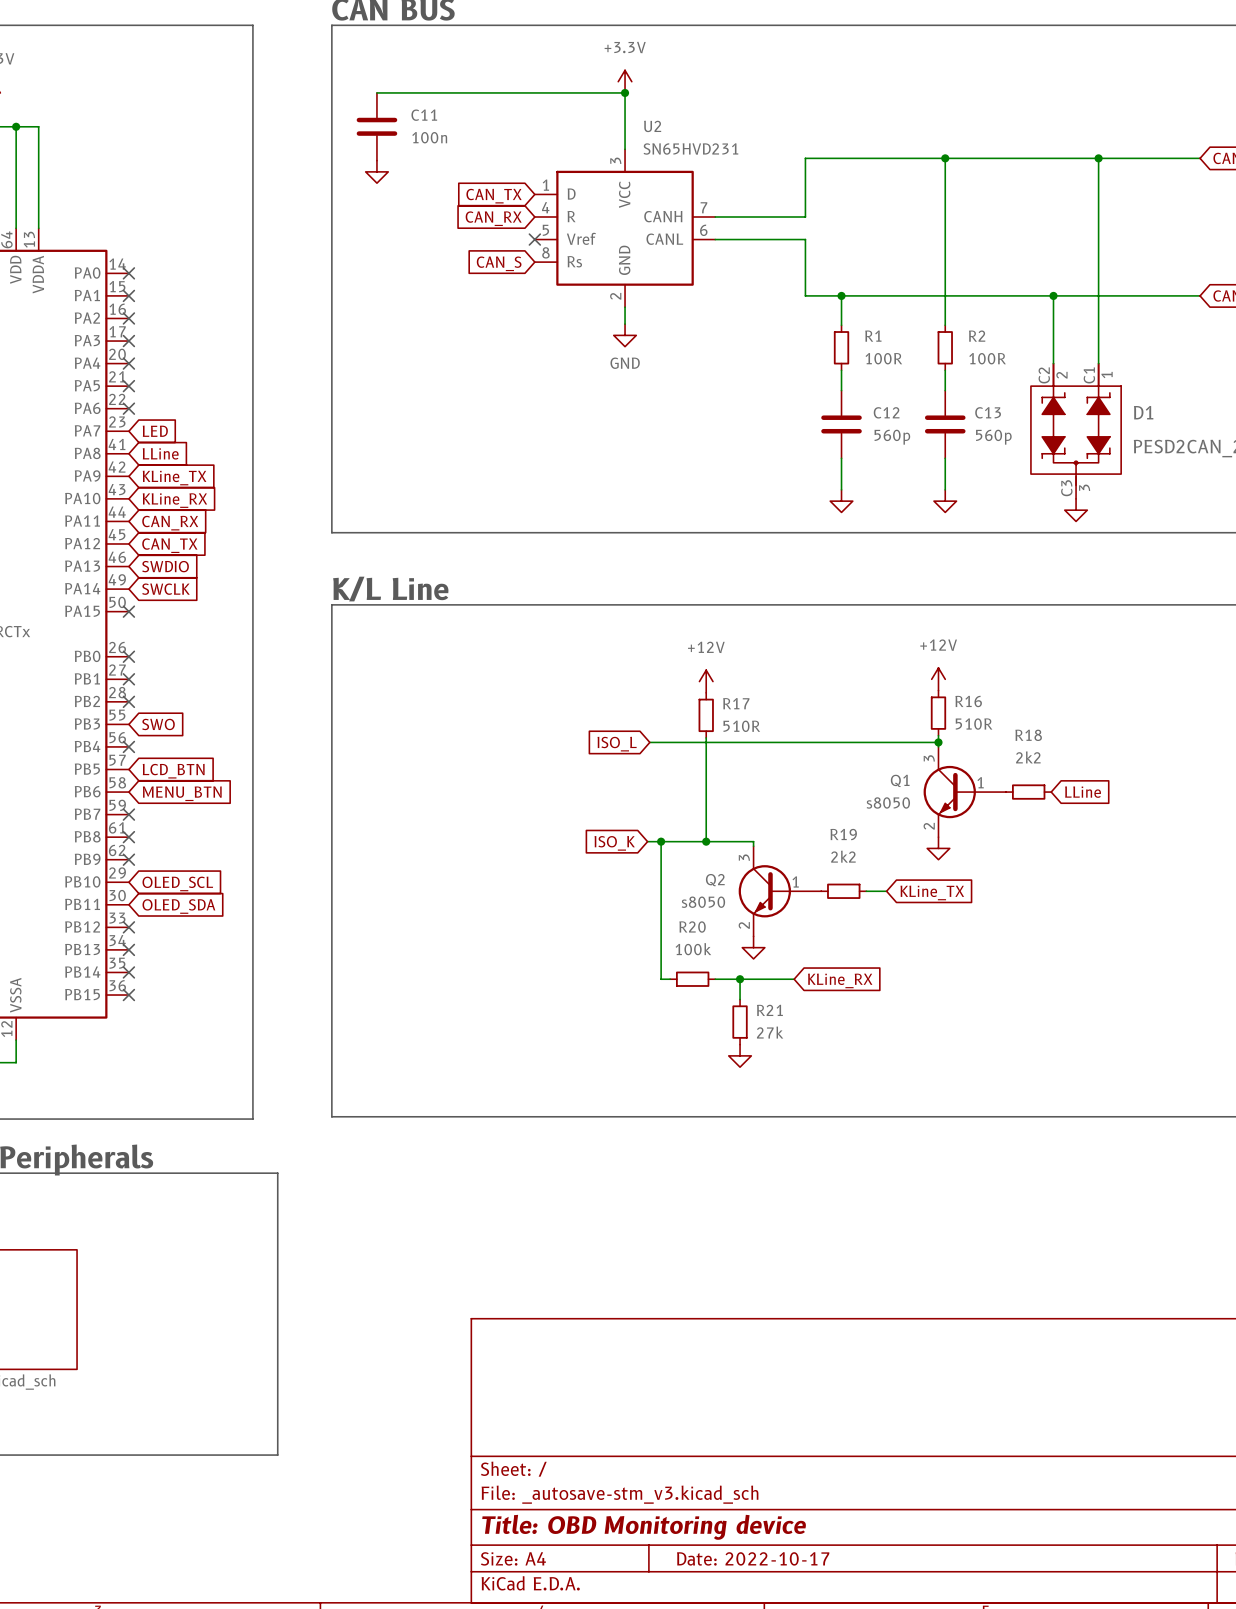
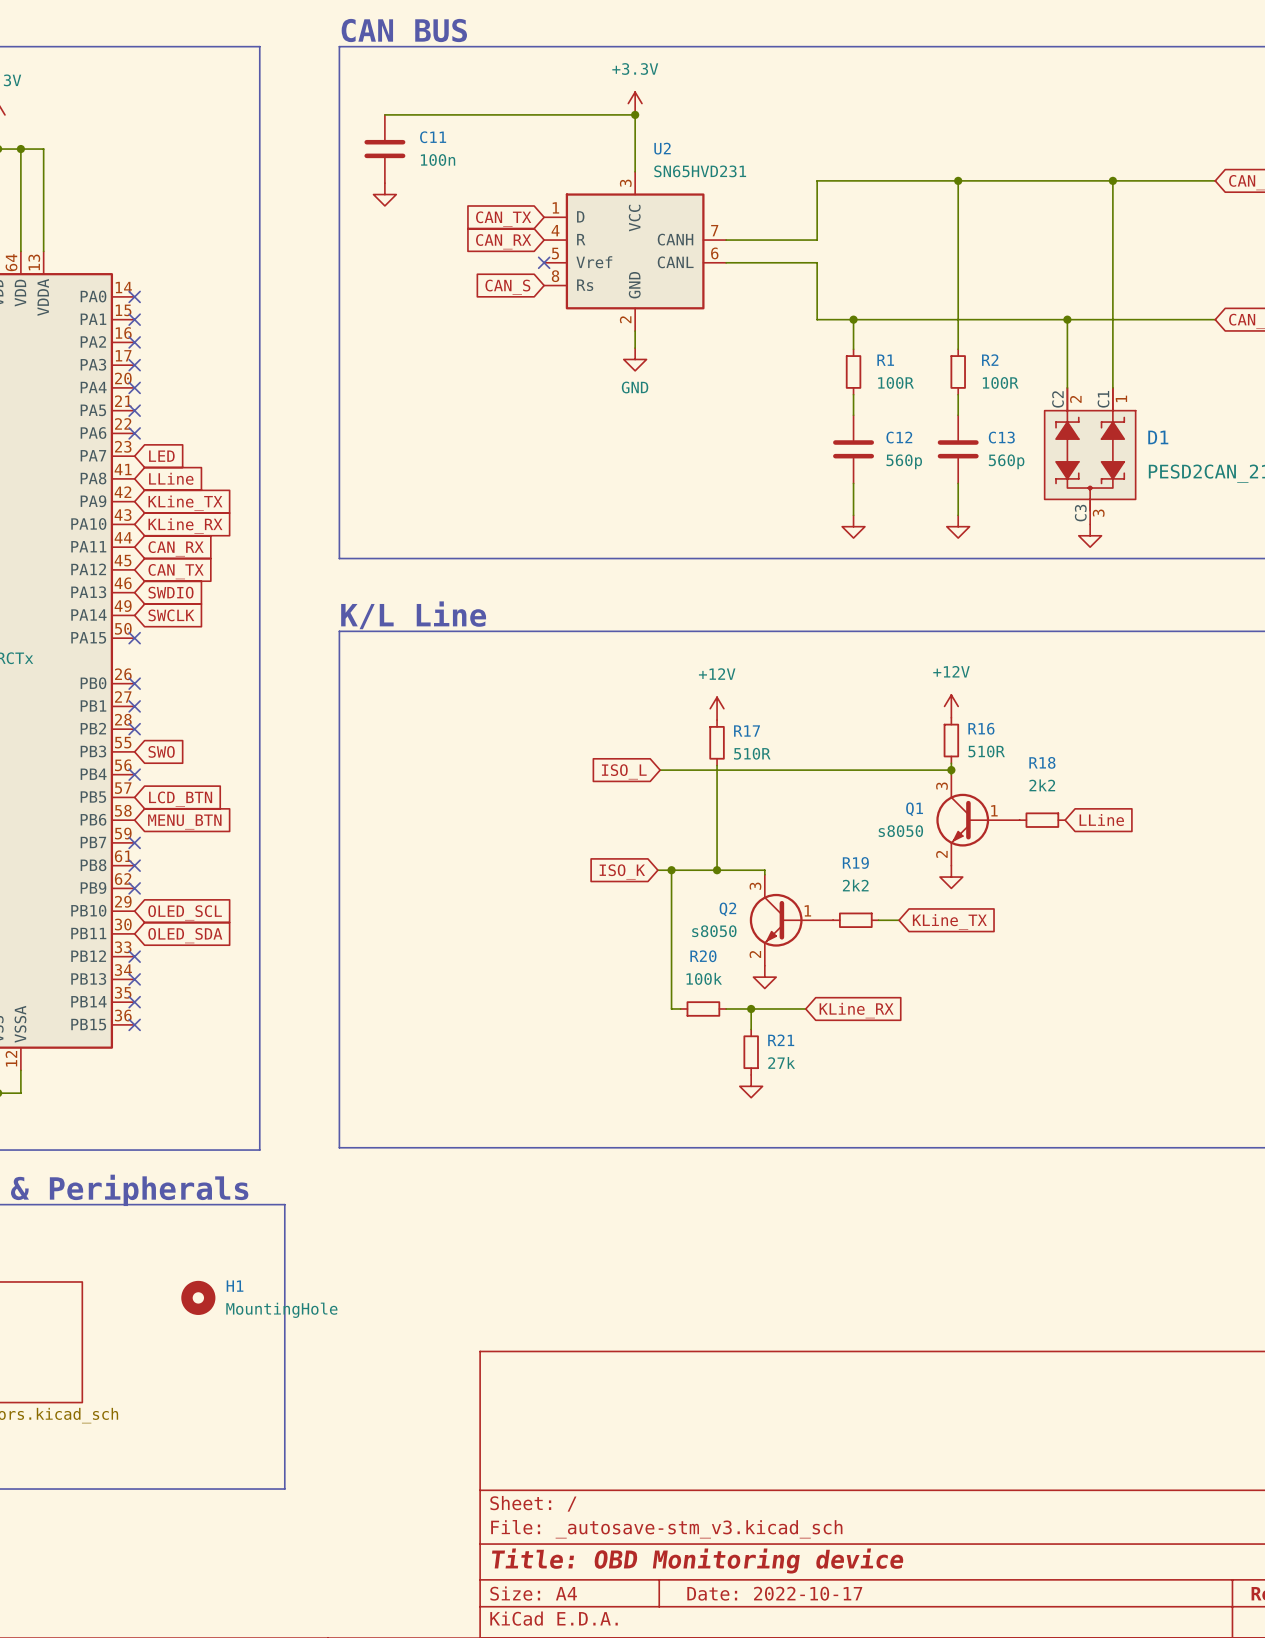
H1: none -> MountingHole (198, 1297)

